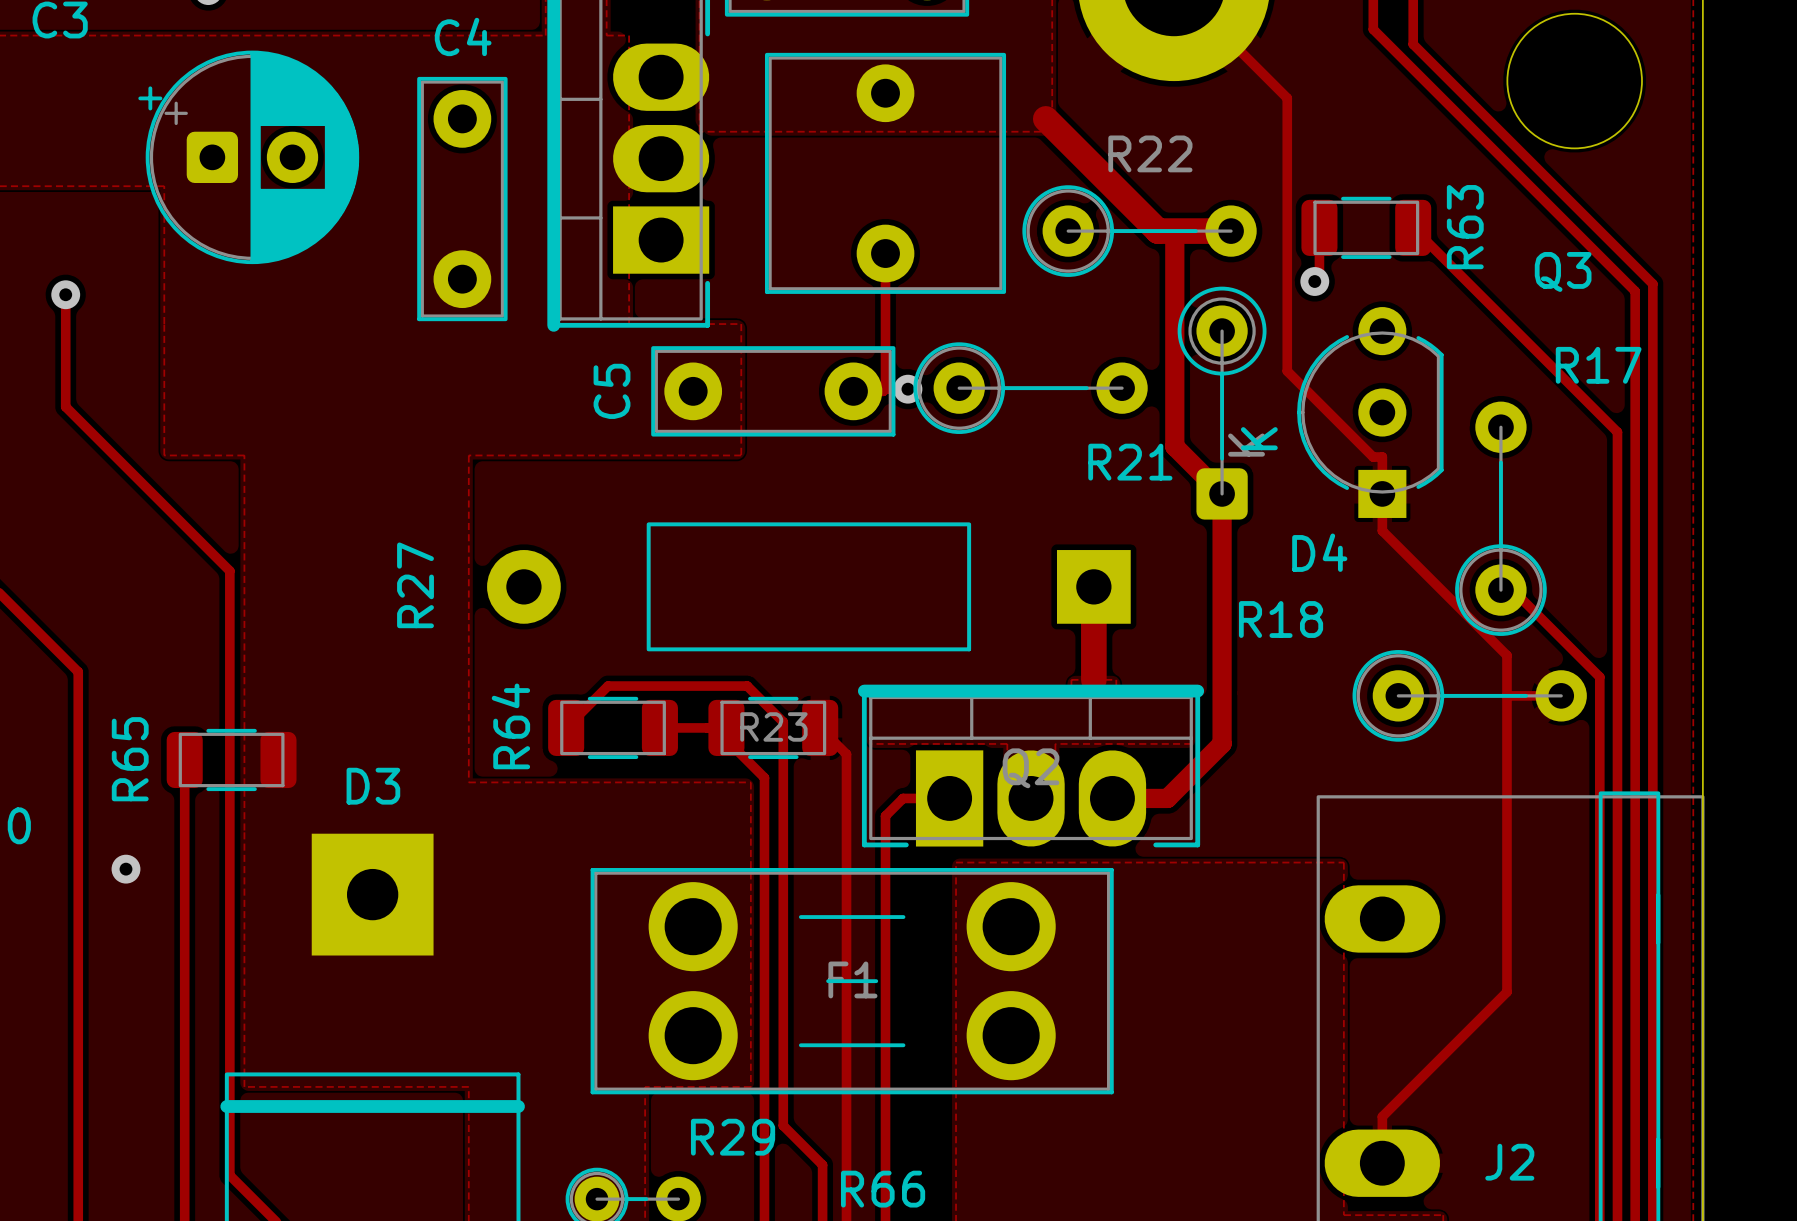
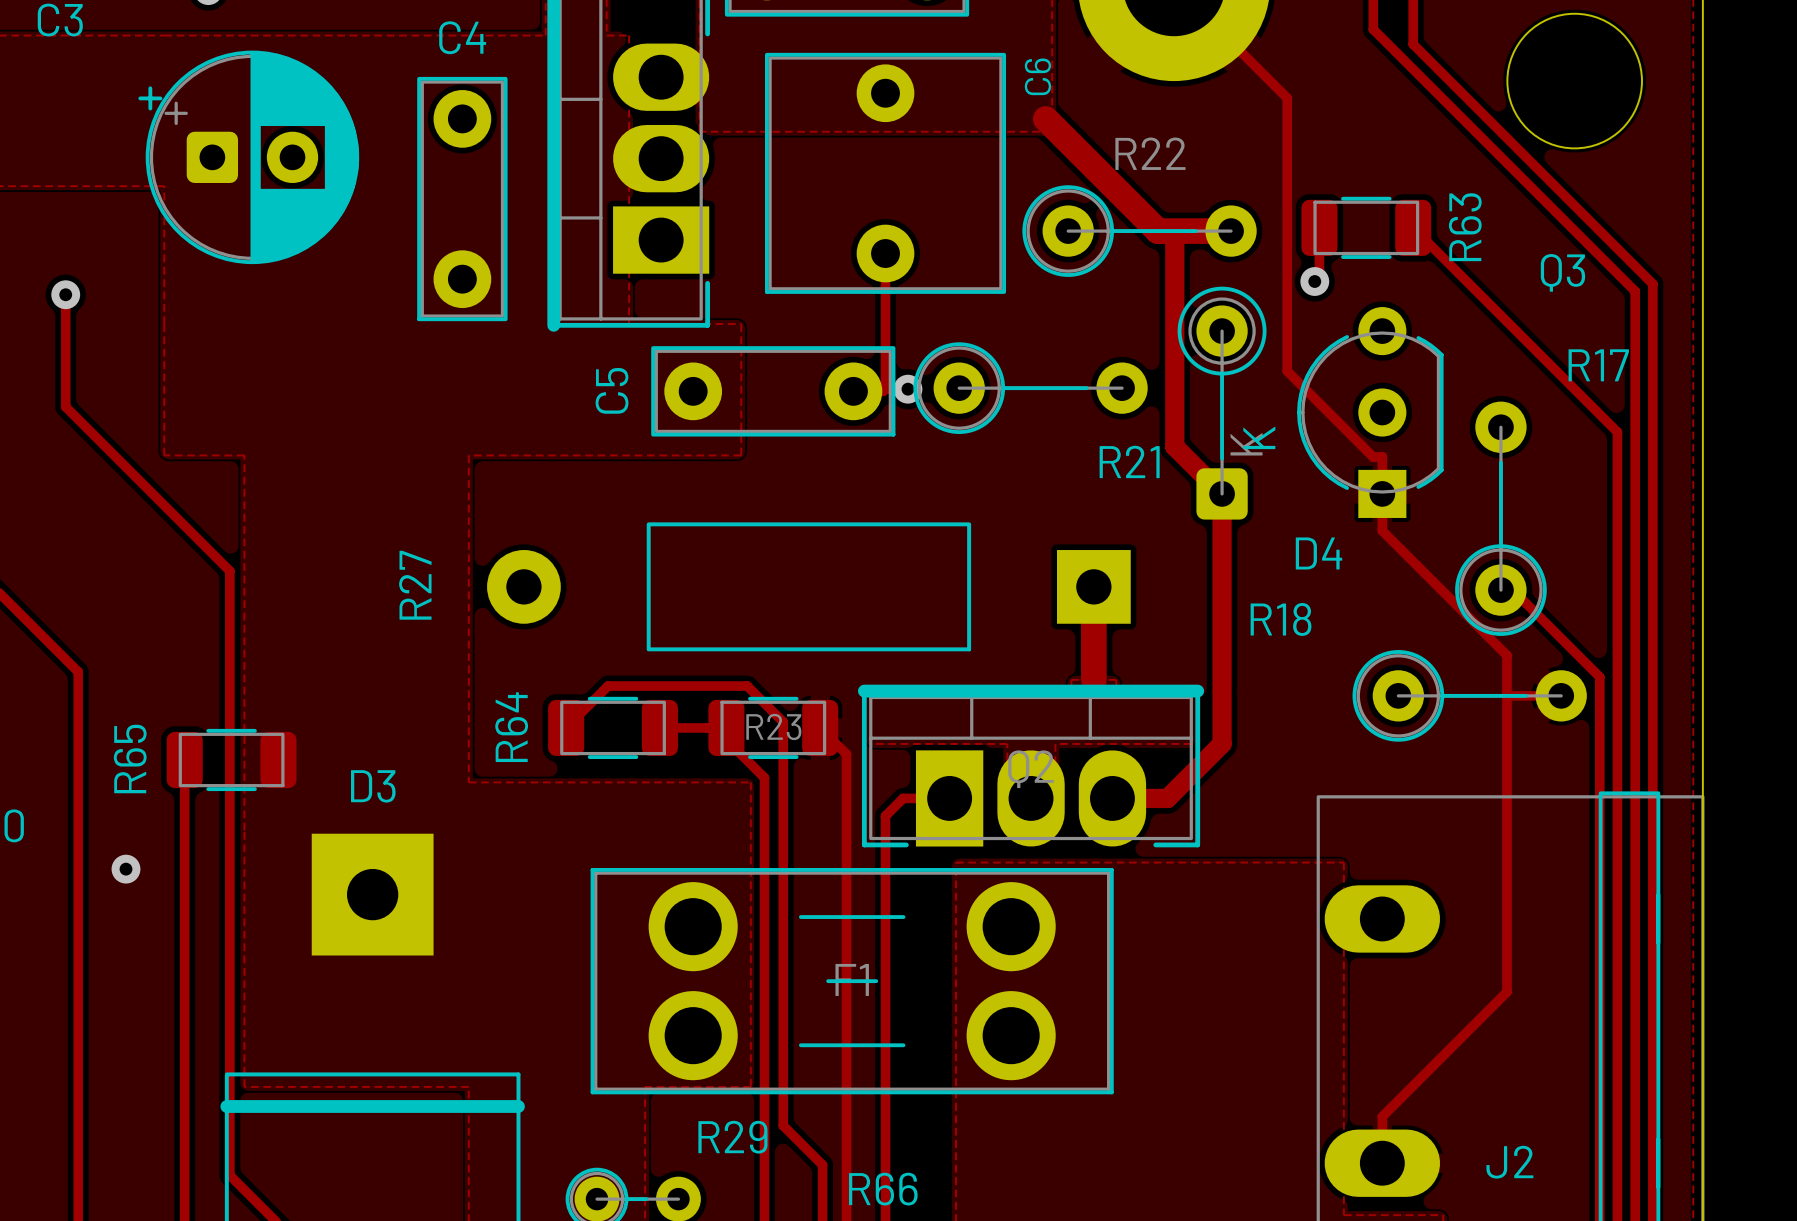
C6 name: none -> C6 (1037, 76)

